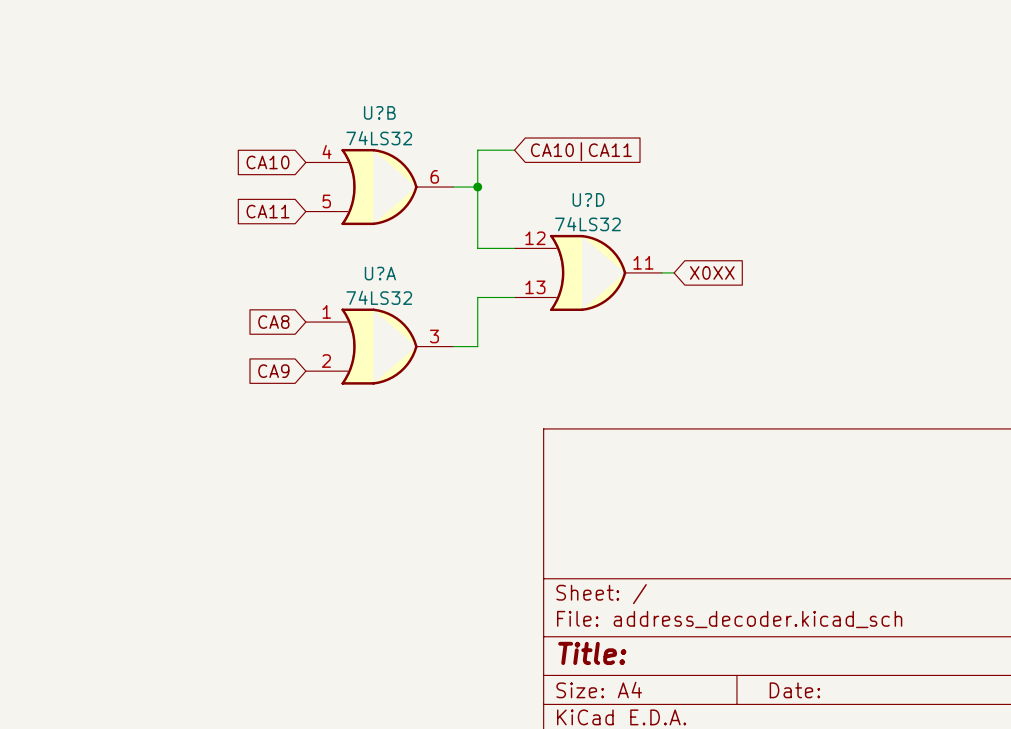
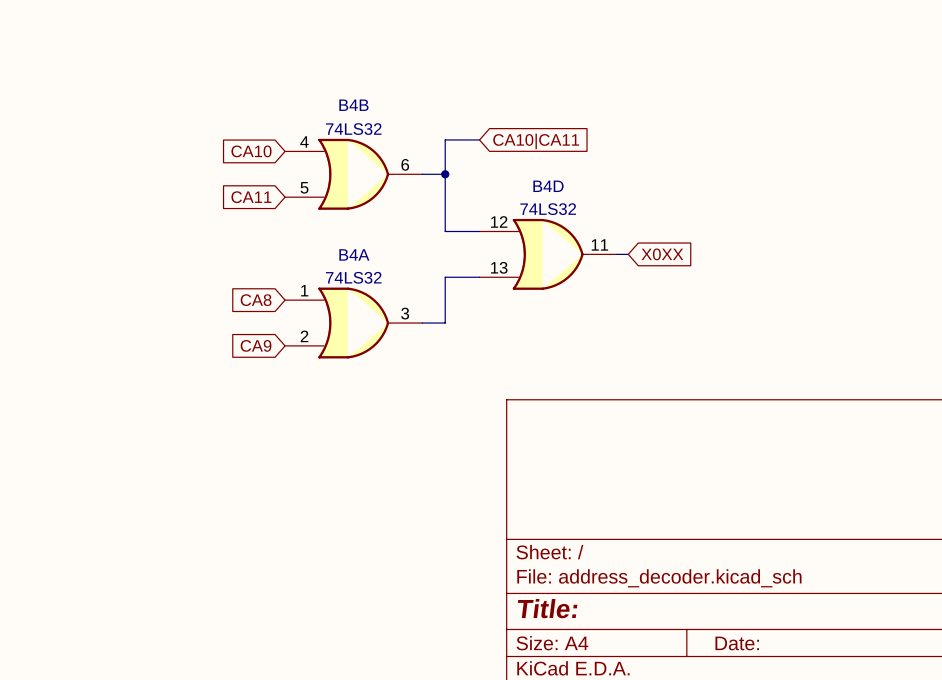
U?B name: U?B (379, 112) -> B4B (353, 105)
U?D name: U?D (588, 199) -> B4D (548, 186)
U?A name: U?A (380, 273) -> B4A (354, 254)

